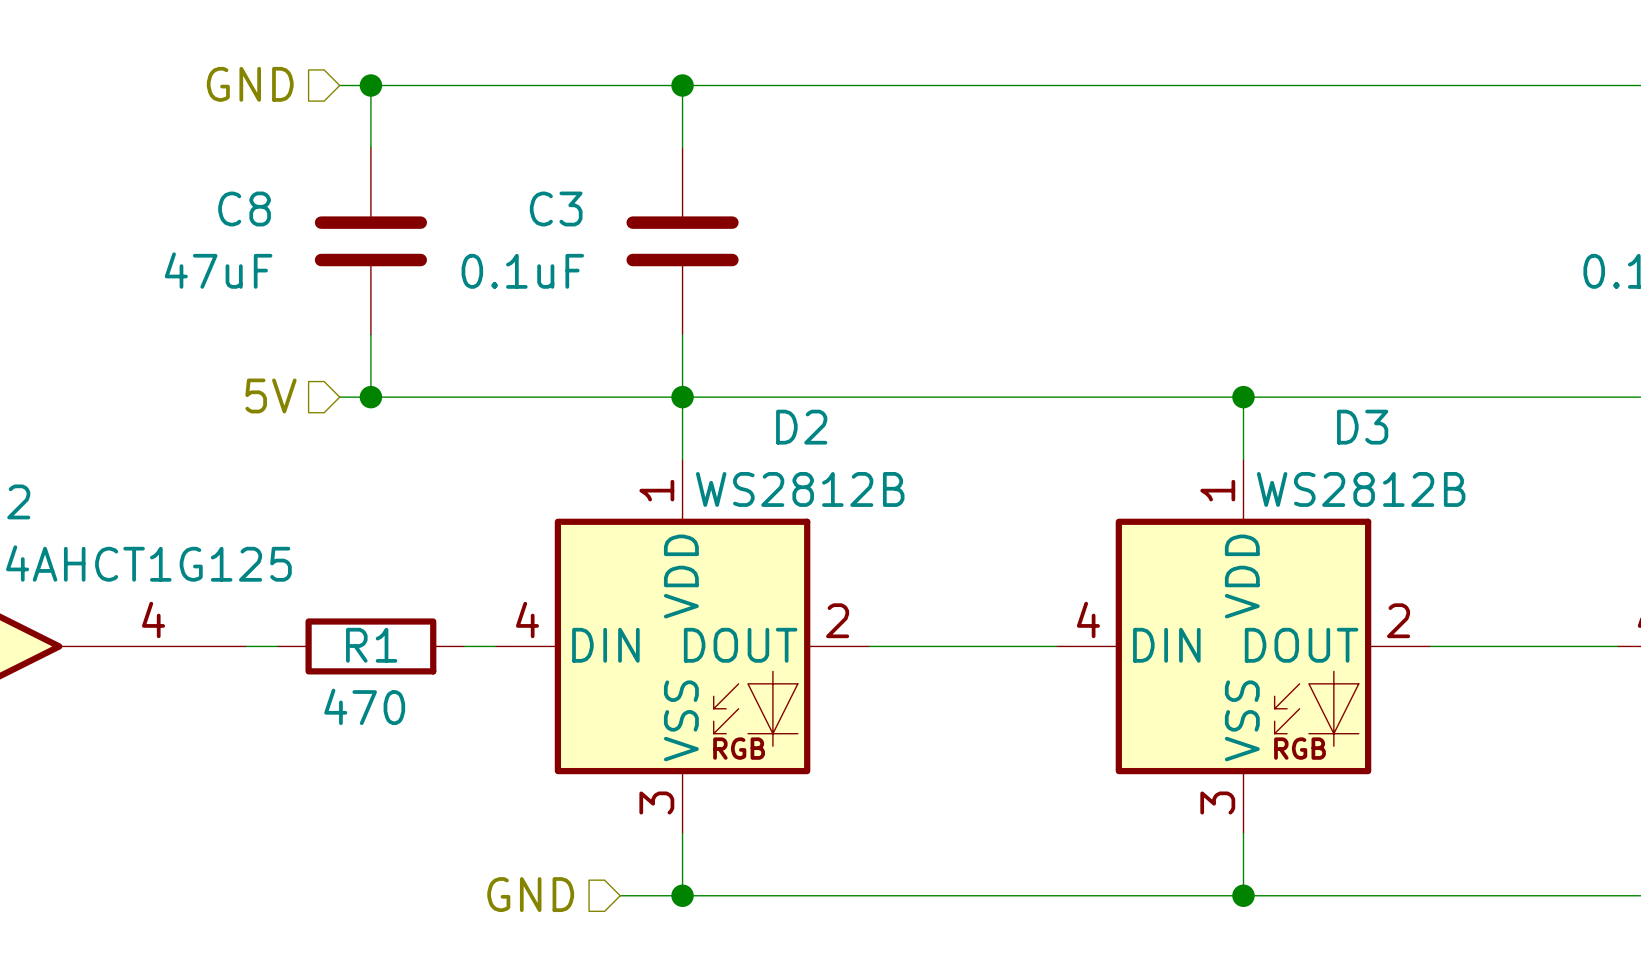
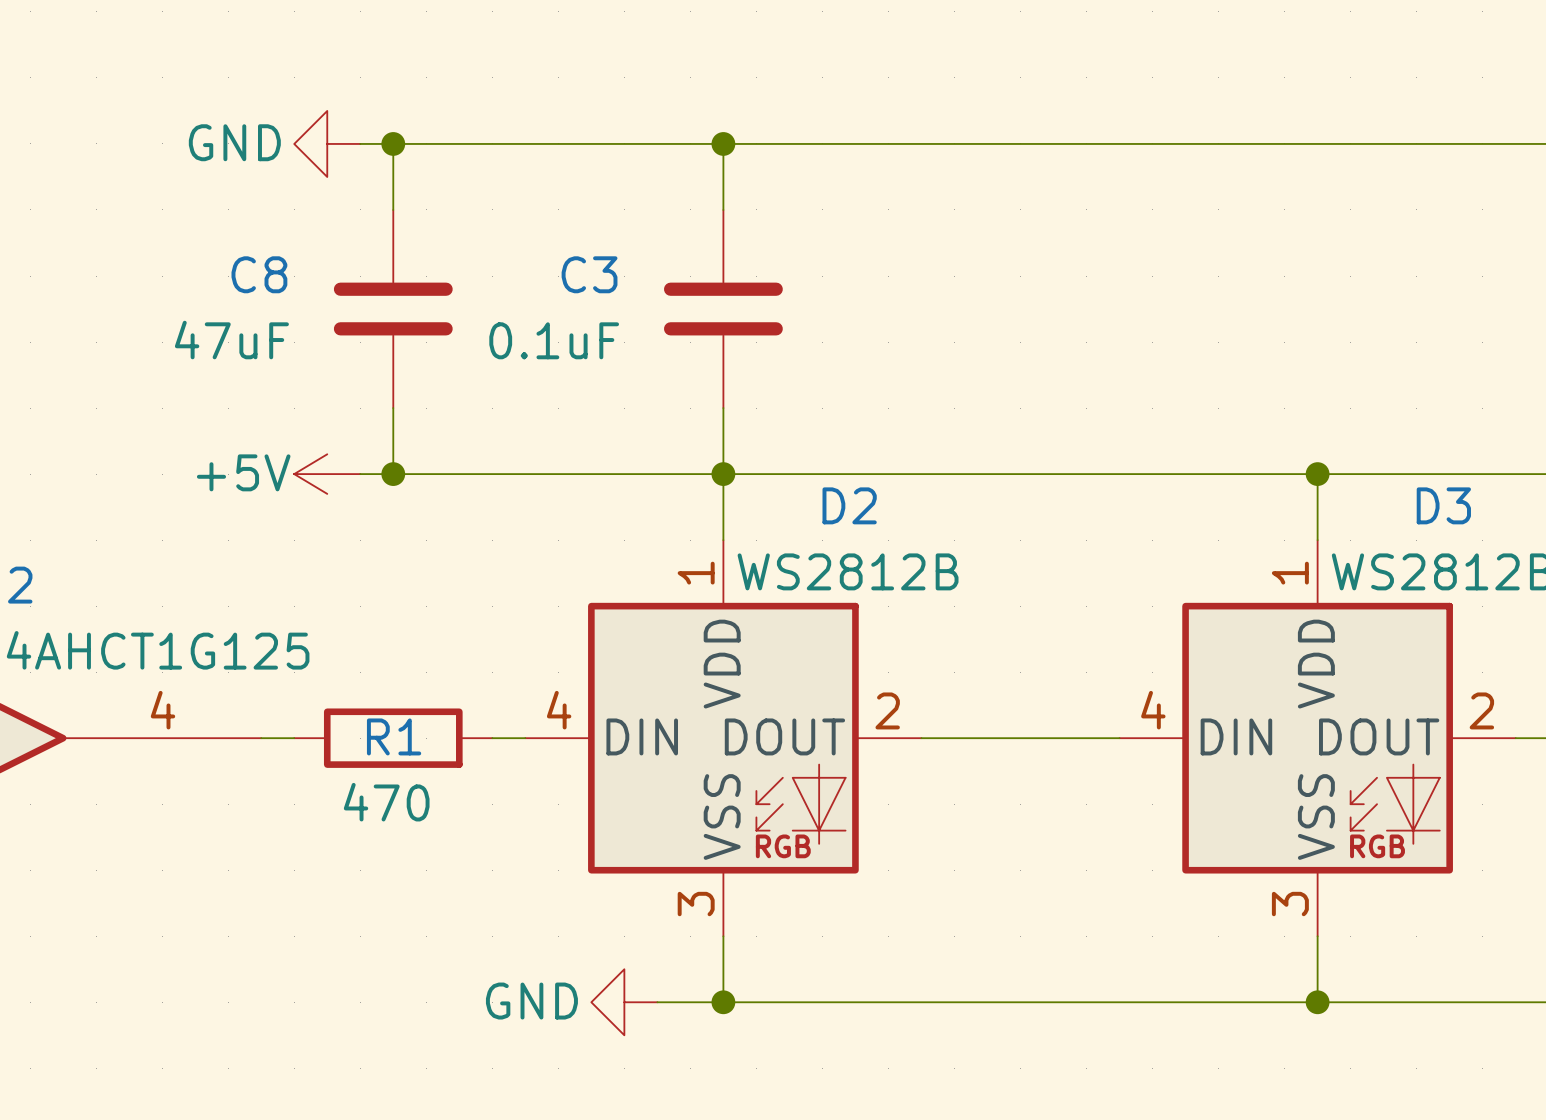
hierarchical label: GND (250, 84) -> none
power symbol: none -> GND (327, 143)
hierarchical label: 5V (271, 395) -> none
power symbol: none -> +5V (327, 474)
hierarchical label: GND (530, 894) -> none
power symbol: none -> GND (624, 1002)

